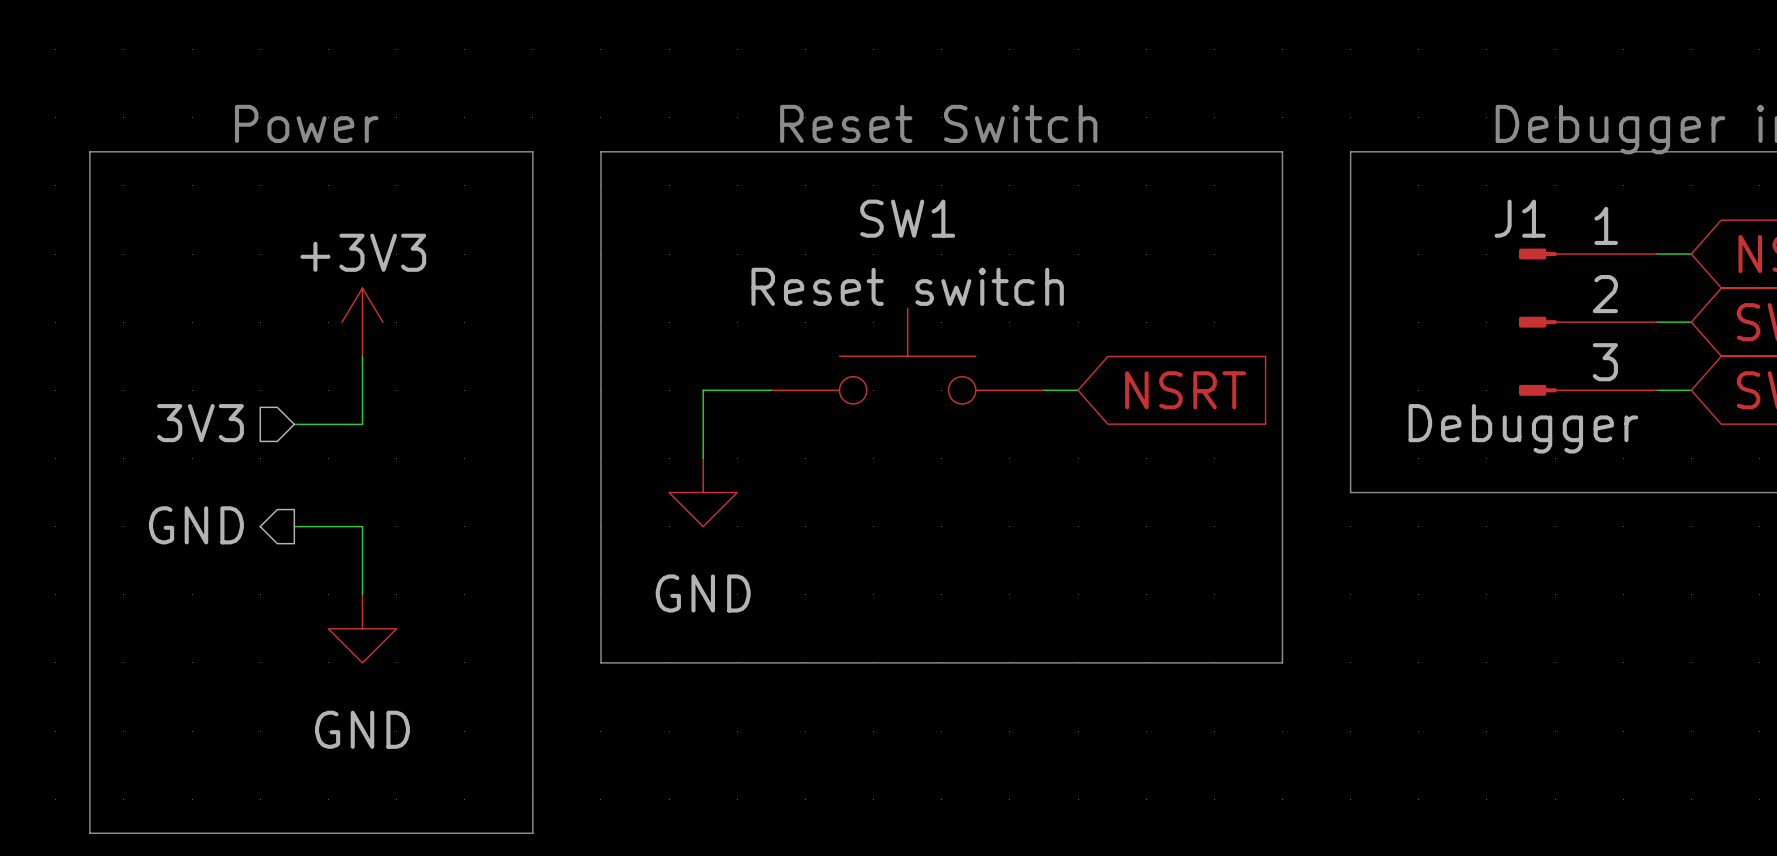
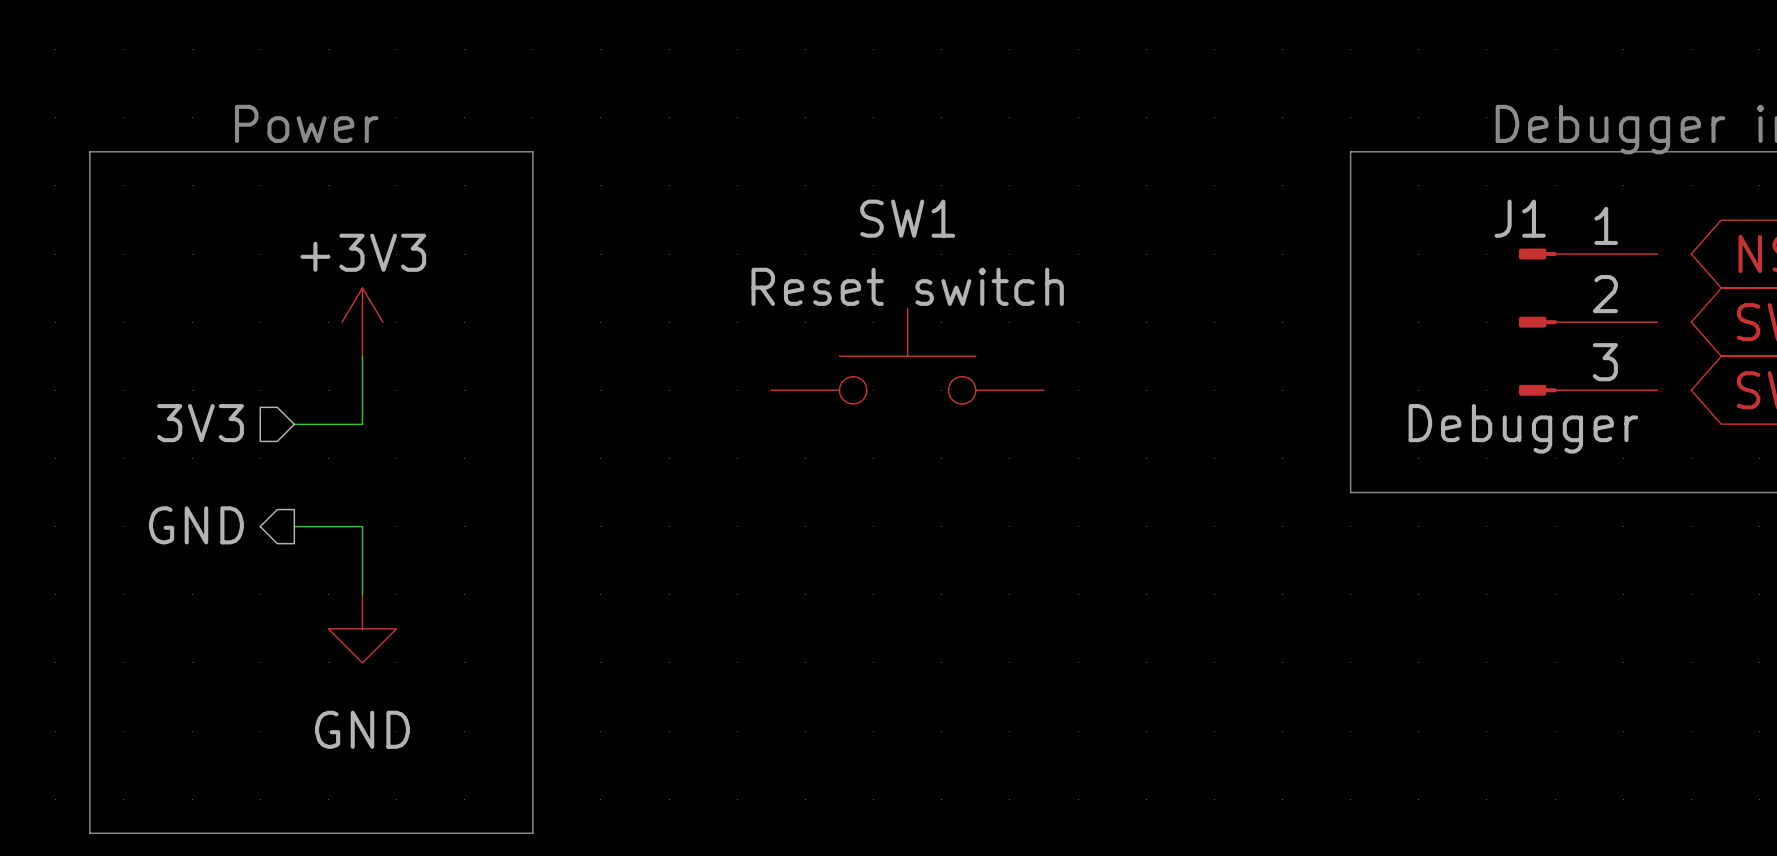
text: Reset Switch (938, 123) -> none
line: (600, 151) (1282, 151) (1282, 662) (600, 662) (600, 151) -> none
wire: (1657, 254) (1691, 254) -> none
wire: (1657, 322) (1691, 322) -> none
wire: (771, 390) (703, 390) (703, 458) -> none
wire: (1043, 390) (1078, 390) -> none
global label: NSRT (1185, 390) -> none
wire: (1657, 390) (1691, 390) -> none
power symbol: GND (703, 492) -> none

